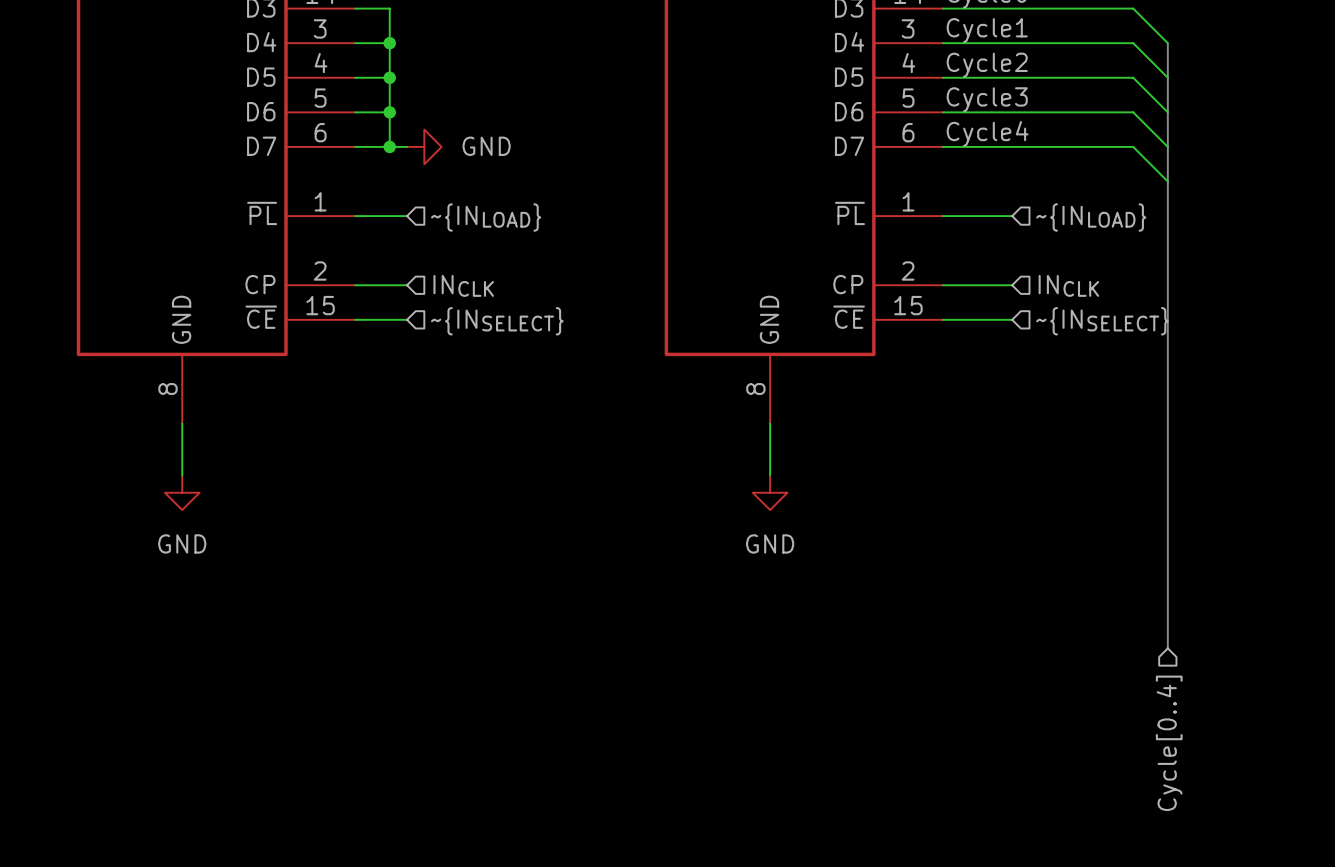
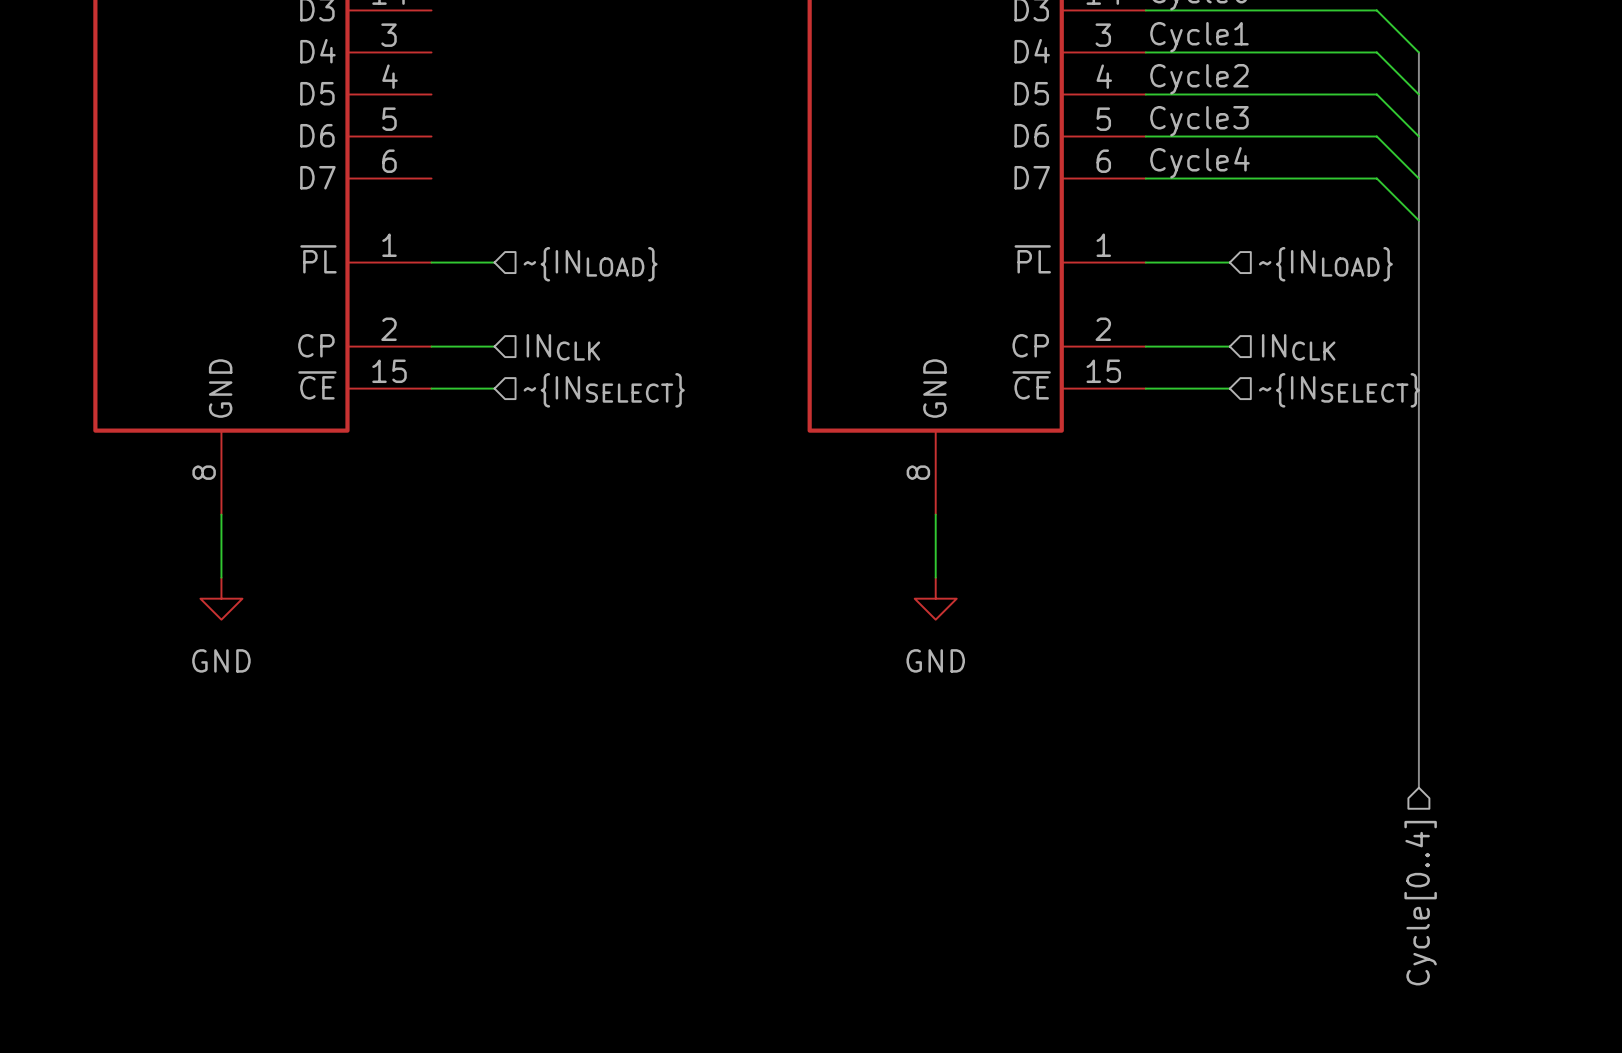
wire: (355, 8) (389, 8) (389, 146) -> none
wire: (355, 43) (389, 43) -> none
junction: (389, 43) -> none
wire: (355, 77) (389, 77) -> none
junction: (389, 77) -> none
wire: (355, 112) (389, 112) -> none
junction: (389, 112) -> none
wire: (355, 146) (407, 146) -> none
junction: (389, 146) -> none
power symbol: GND (424, 146) -> none

